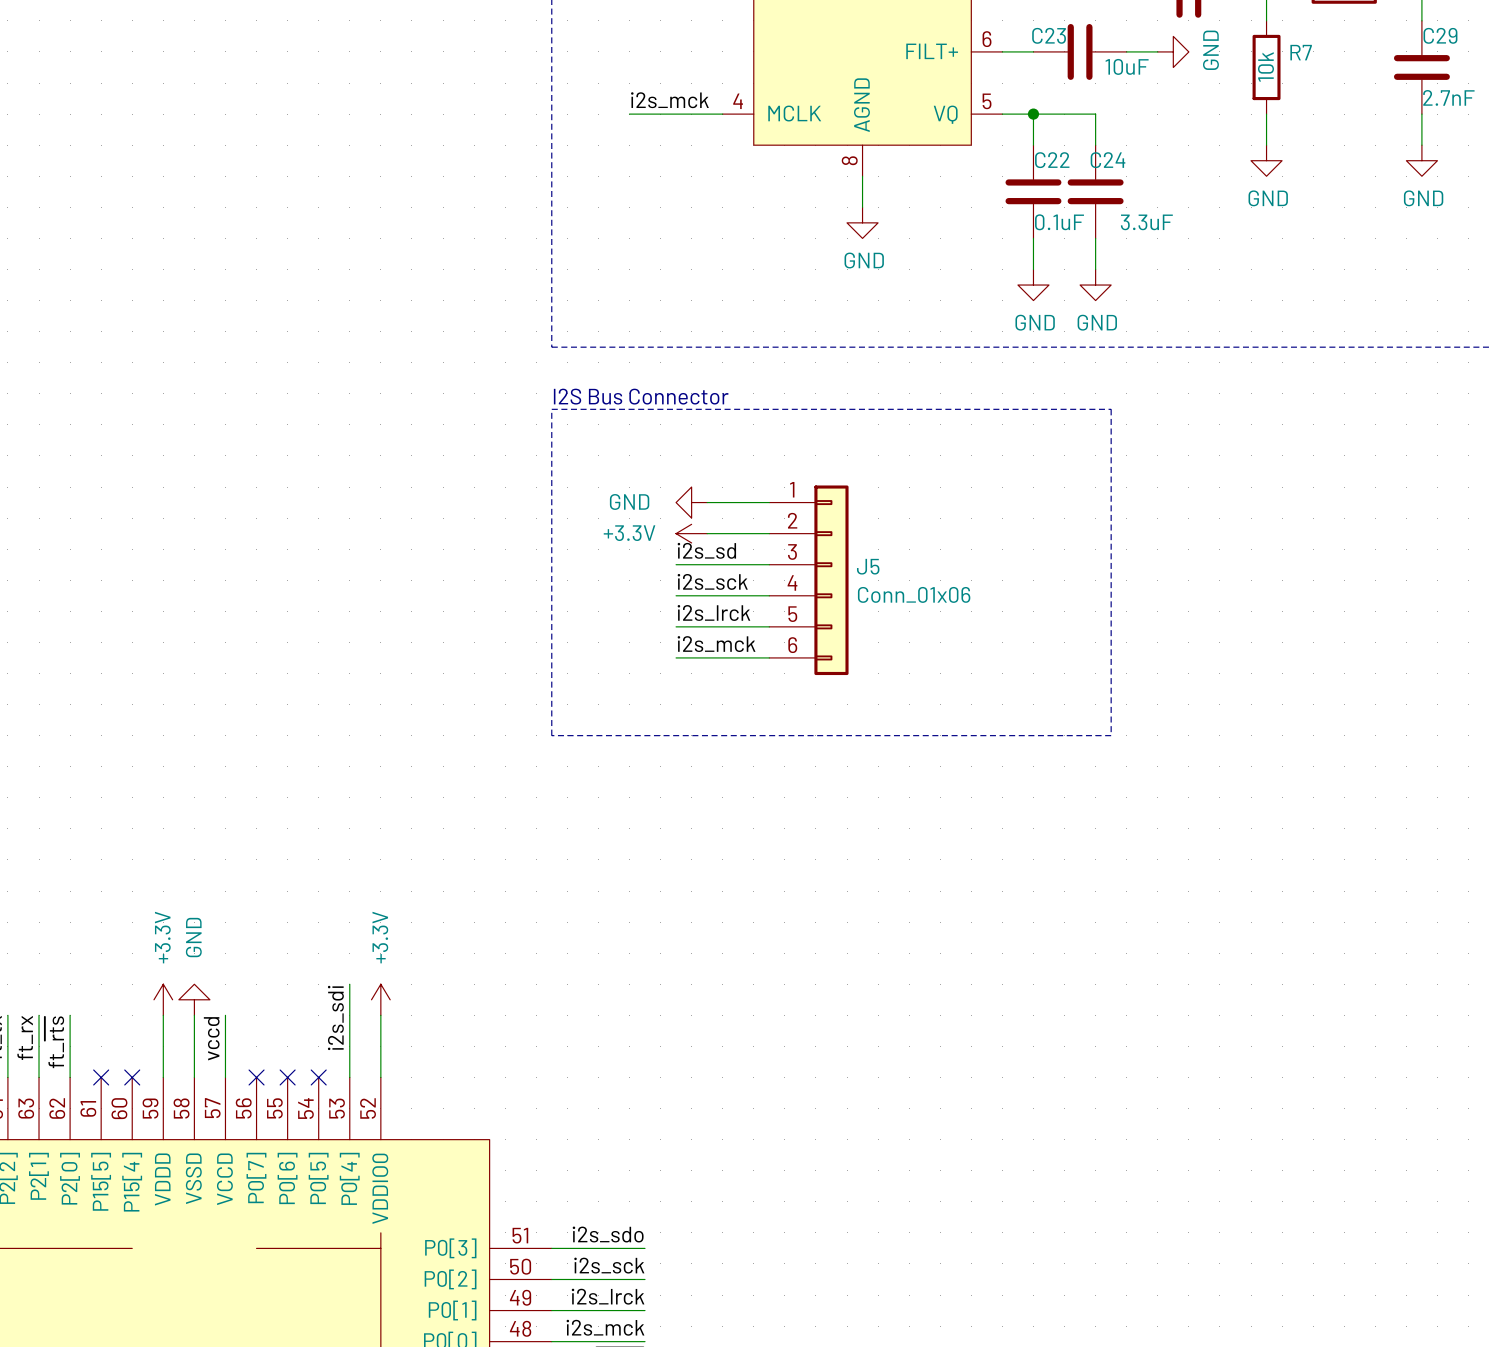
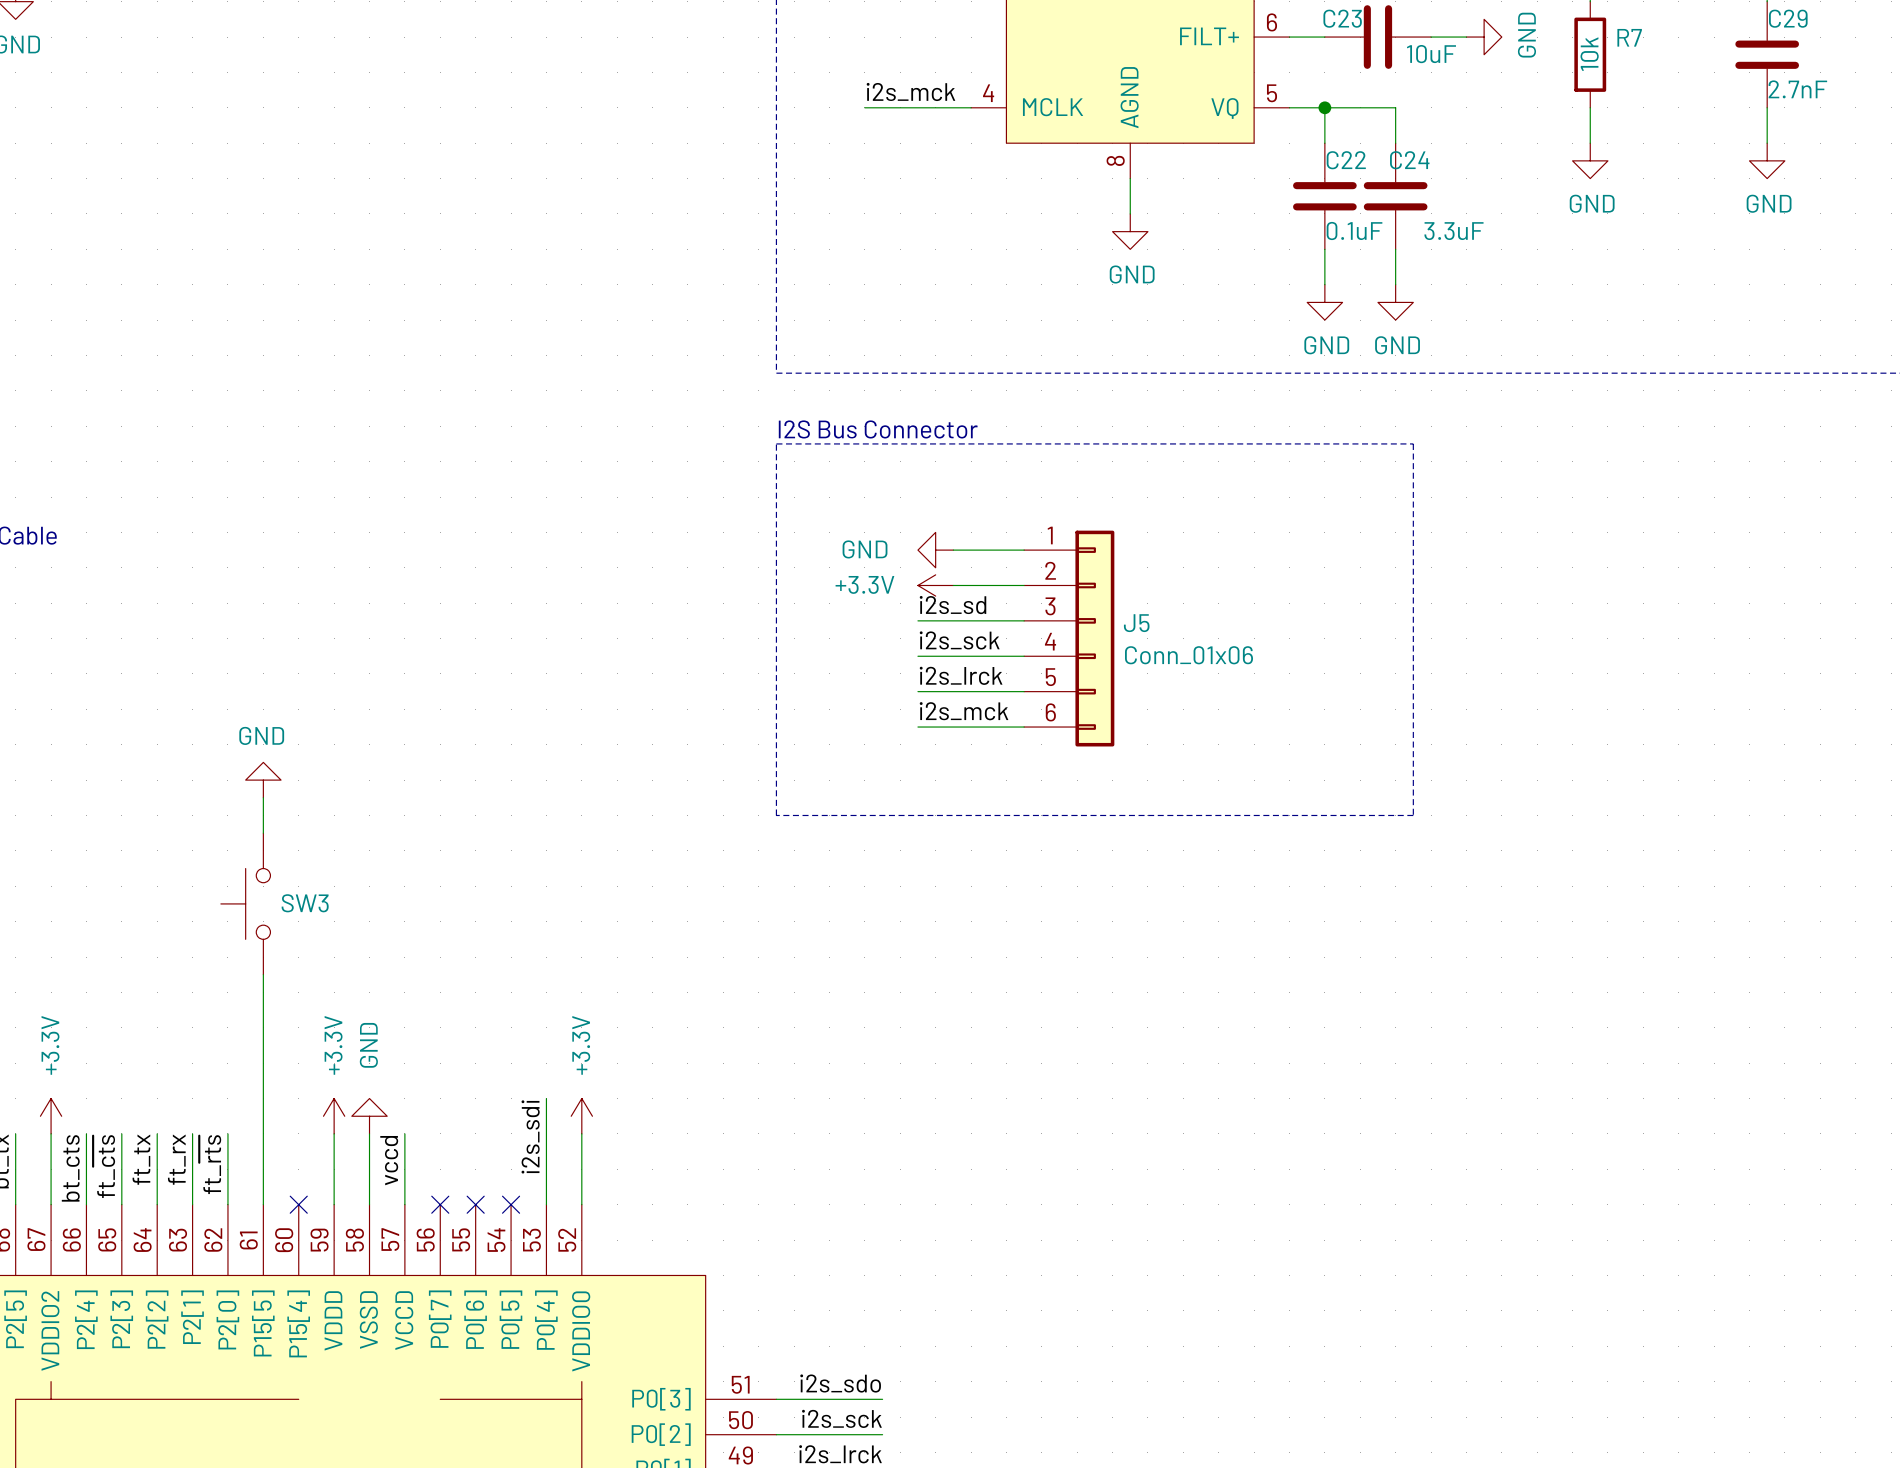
power symbol: none -> GND (263, 780)
wire: none -> (263, 797) (263, 833)
SW3: none -> (245, 903)
wire: none -> (263, 974) (263, 1204)
no-connect mark: (101, 1077) -> none

